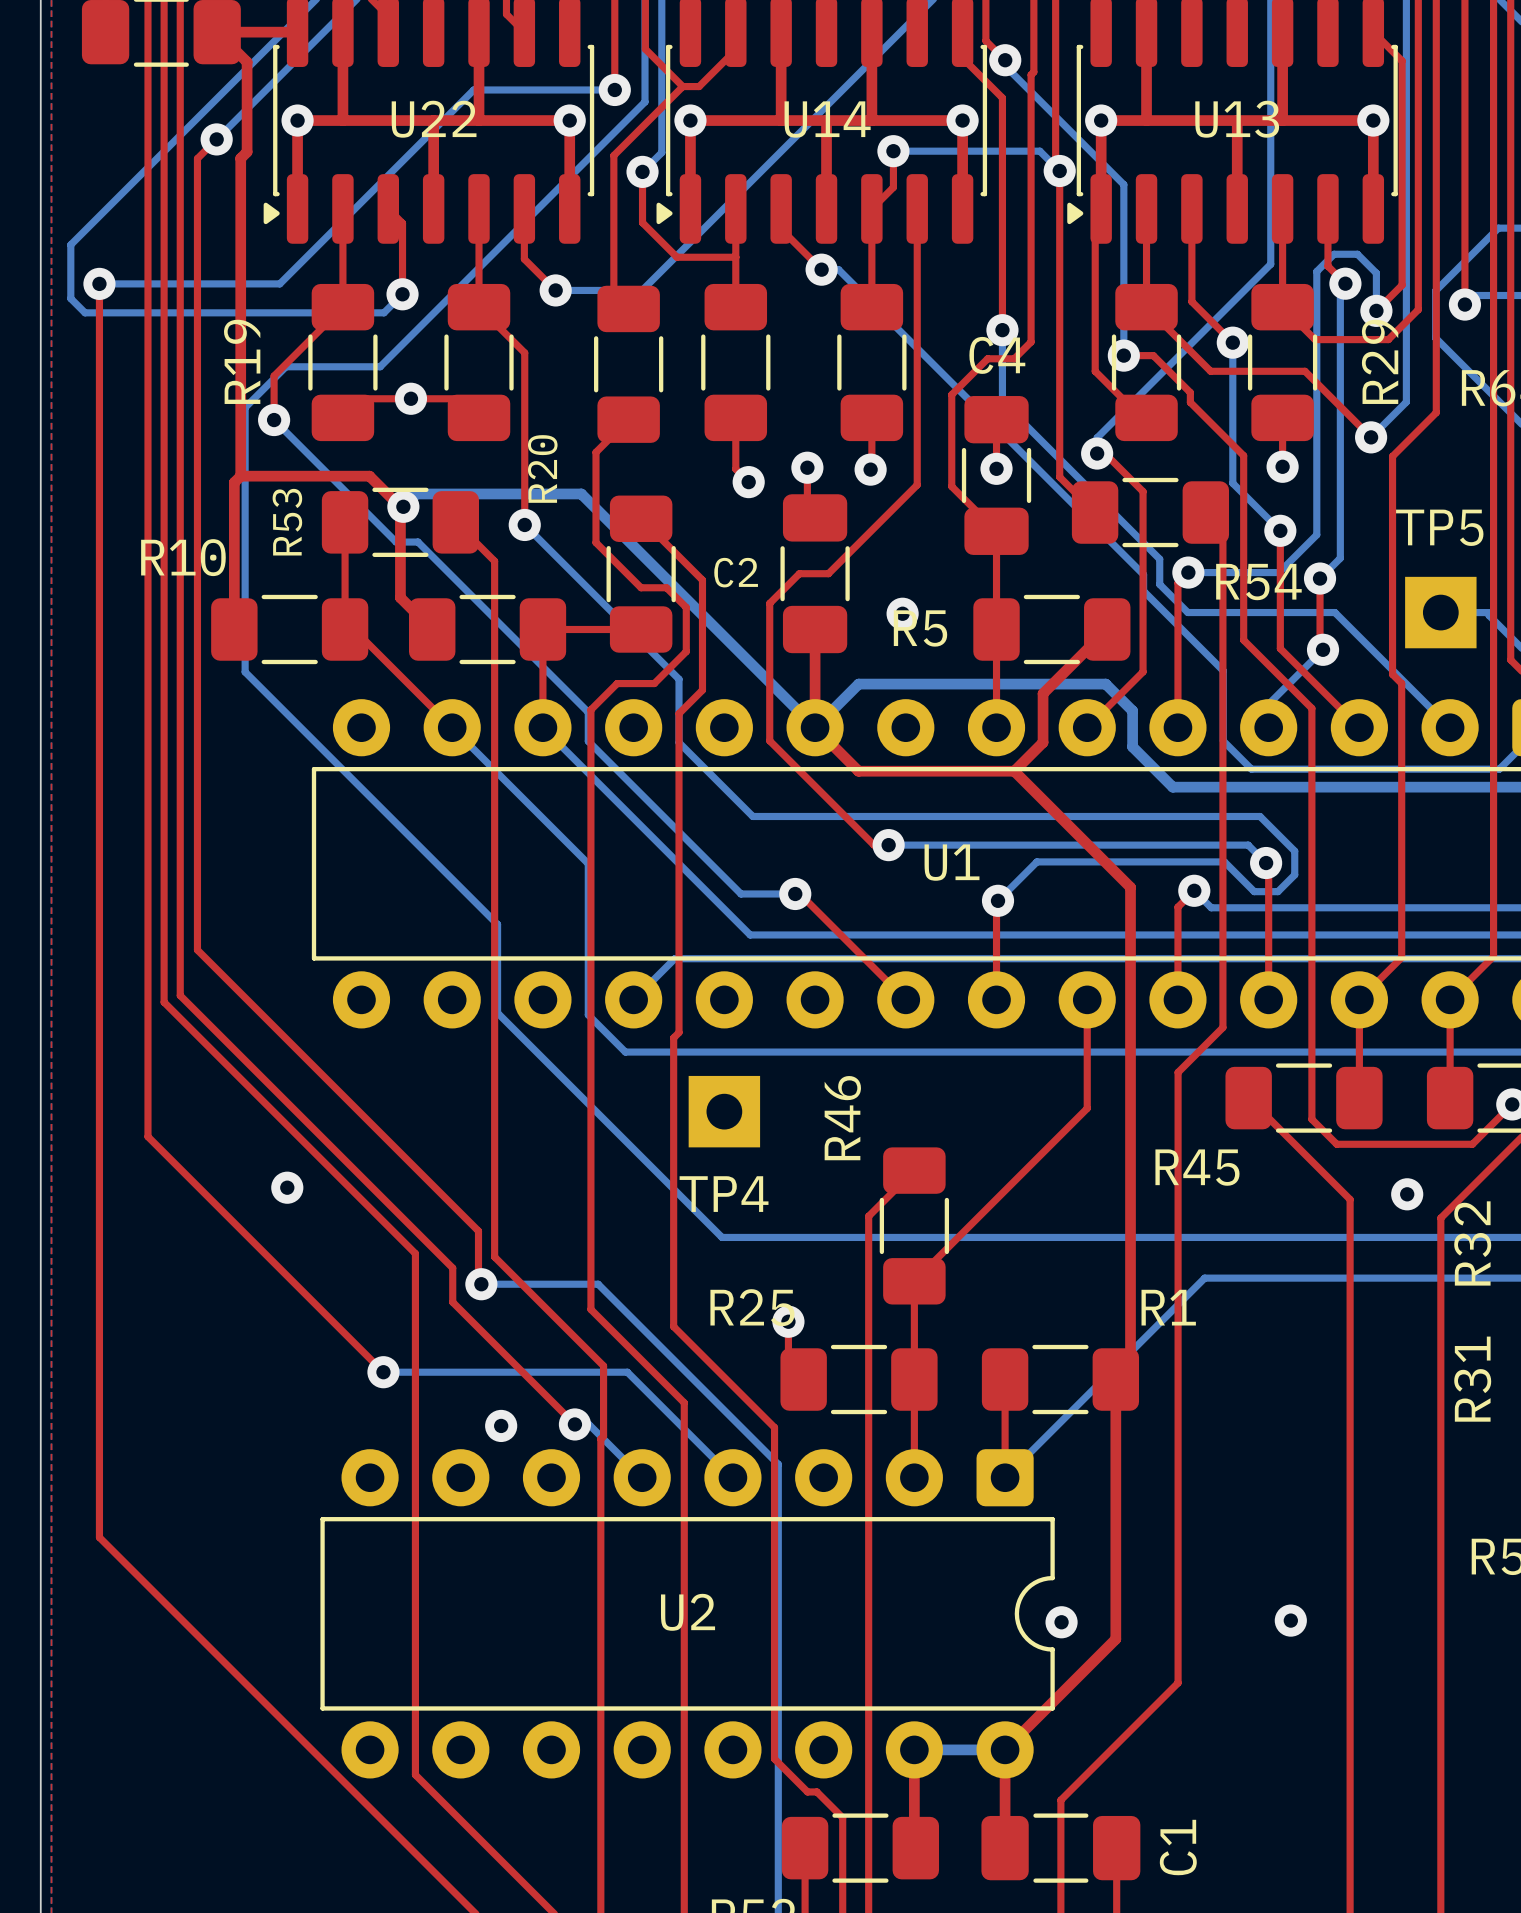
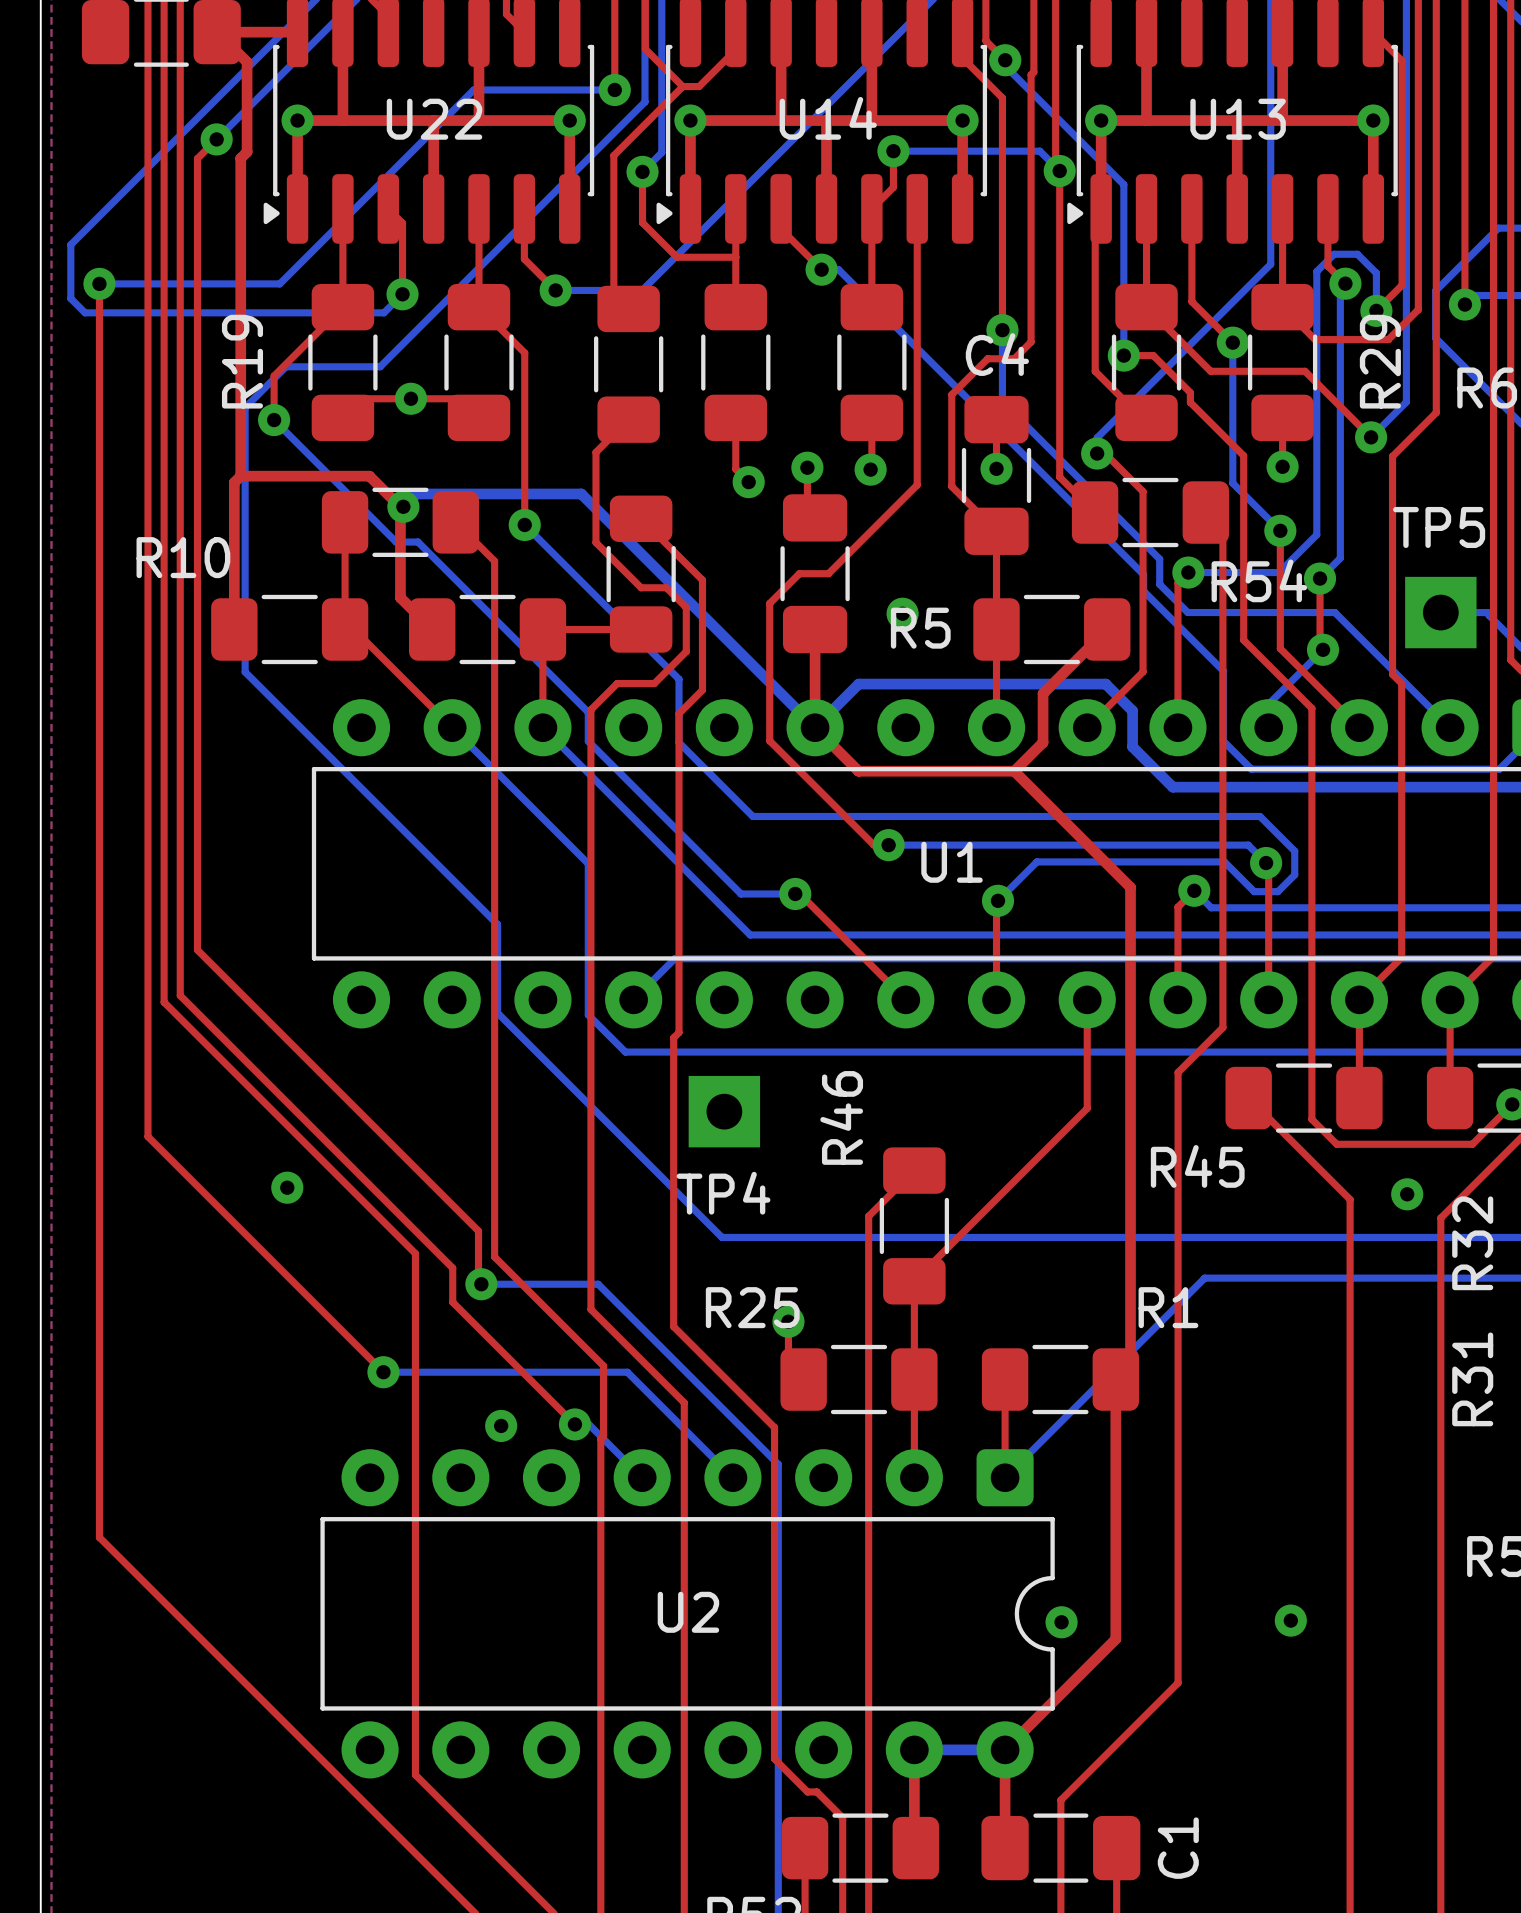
R20 name: R20 (542, 468) -> none
R53 name: R53 (287, 522) -> none
C2 name: C2 (736, 572) -> none

